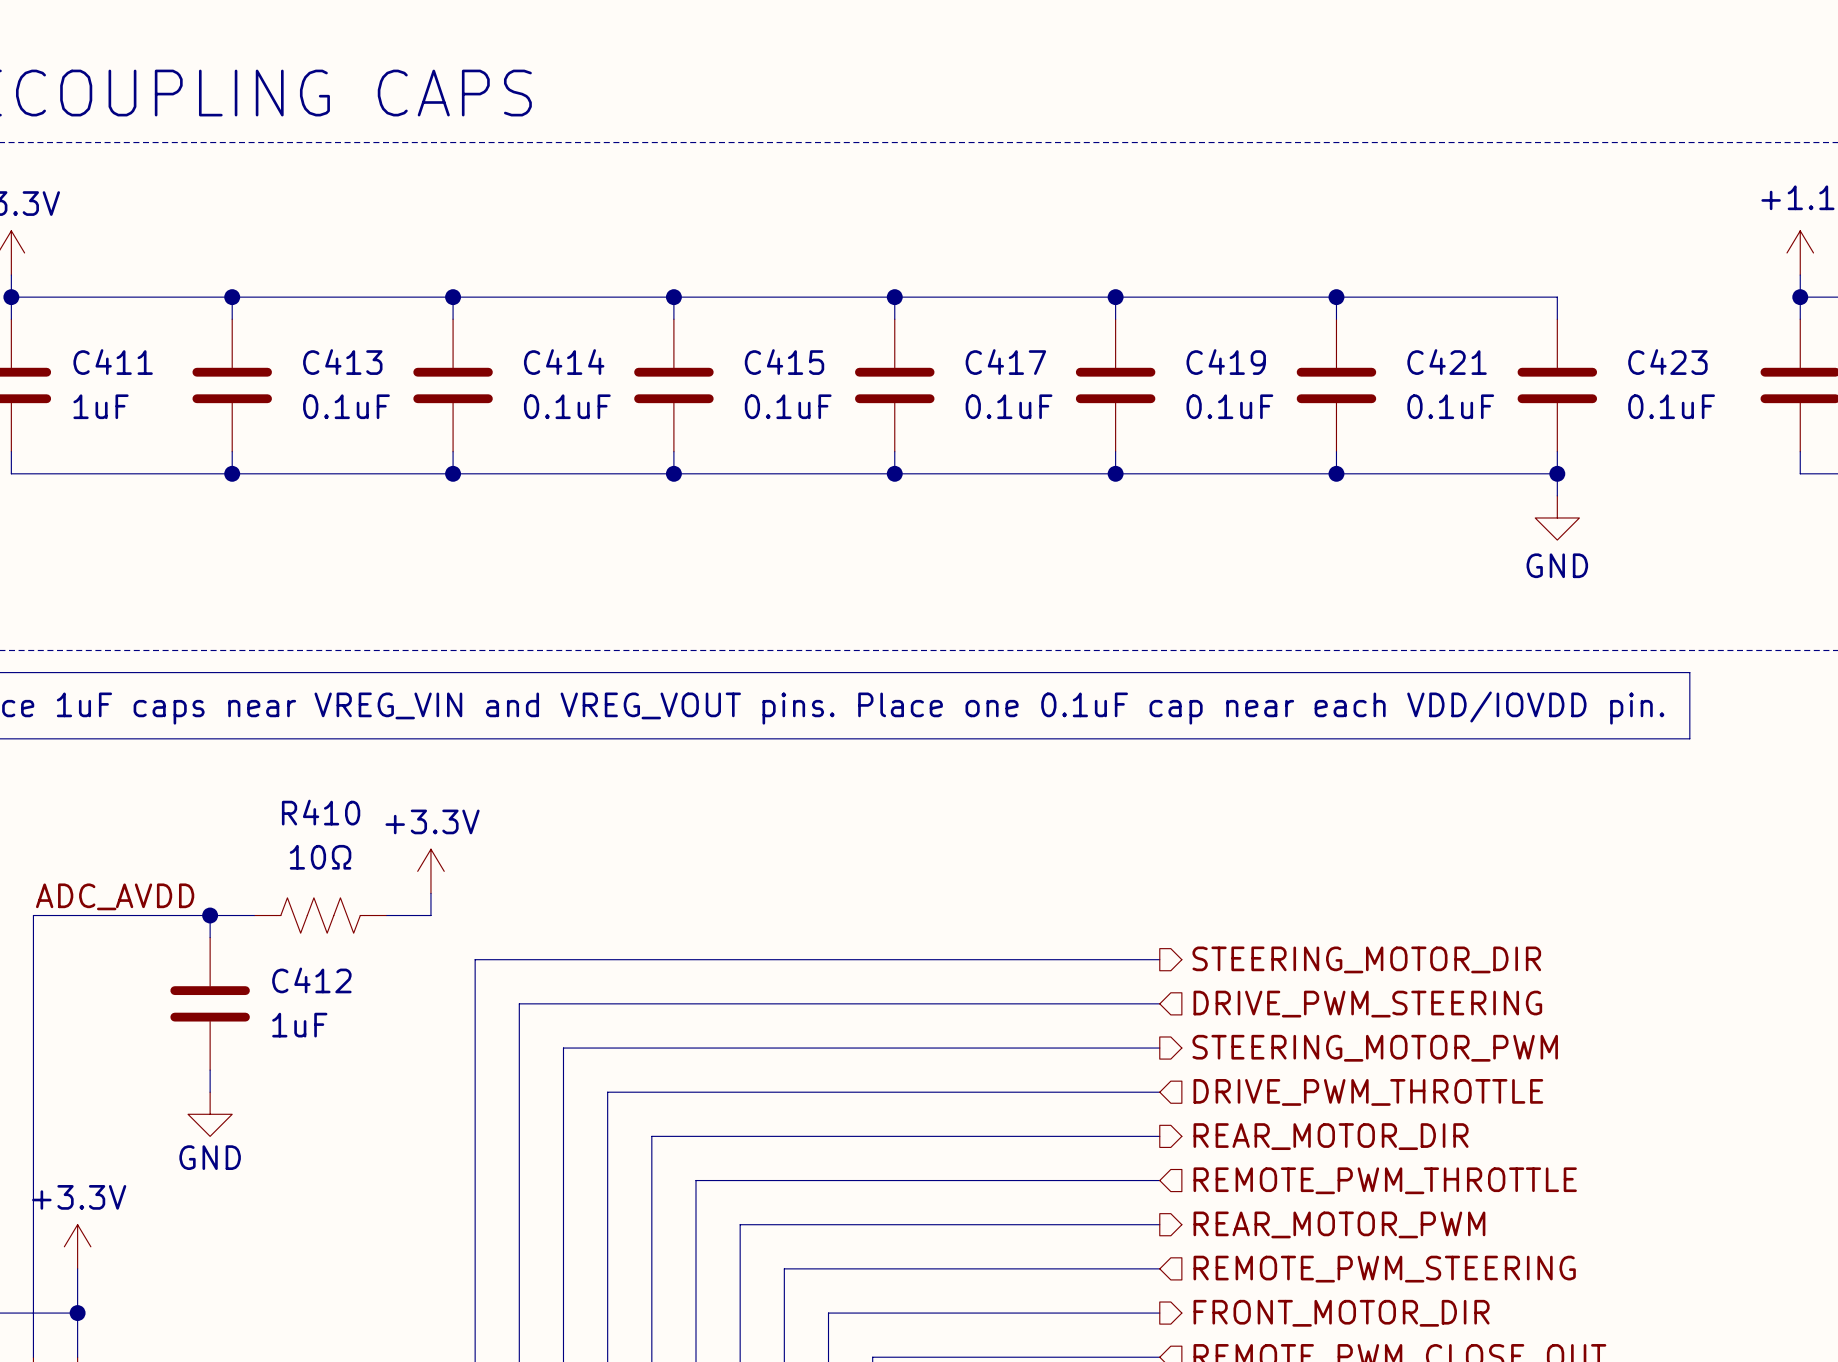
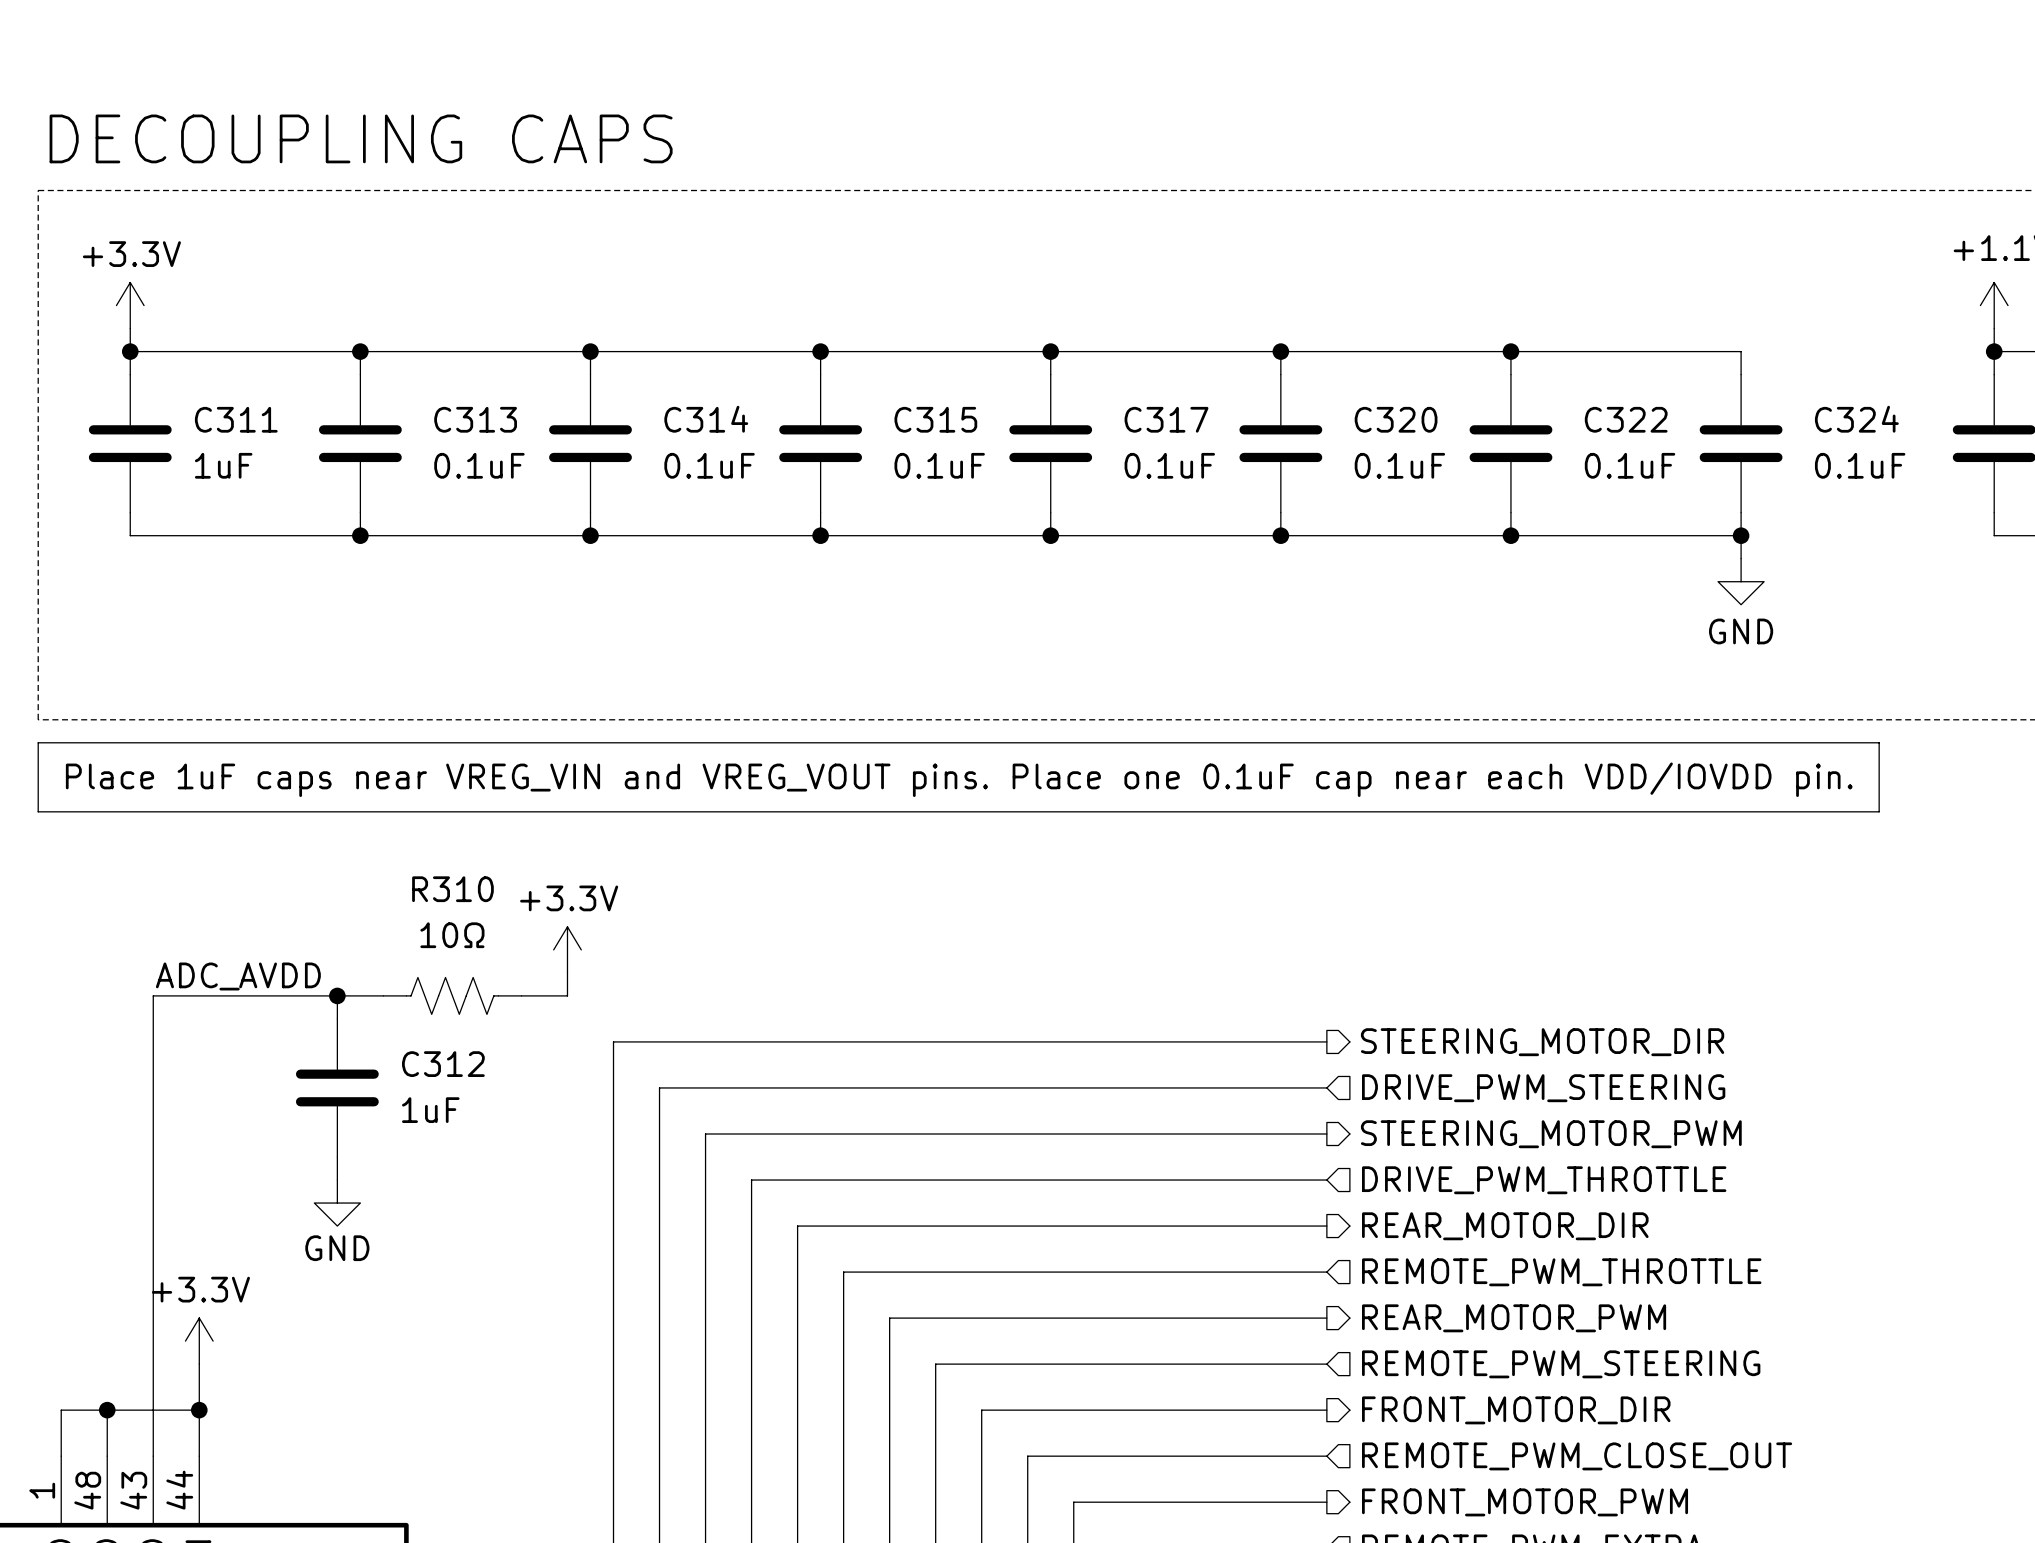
C411 name: C411 (113, 362) -> C311 (236, 419)
C413 name: C413 (342, 362) -> C313 (475, 419)
C414 name: C414 (564, 362) -> C314 (706, 419)
C415 name: C415 (784, 362) -> C315 (935, 419)
C417 name: C417 (1005, 362) -> C317 (1166, 419)
C419 name: C419 (1226, 362) -> C320 (1396, 419)
C421 name: C421 (1447, 362) -> C322 (1626, 419)
C423 name: C423 (1667, 362) -> C324 (1856, 419)
R410 name: R410 (321, 812) -> R310 (452, 889)
C412 name: C412 (311, 980) -> C312 (443, 1064)

